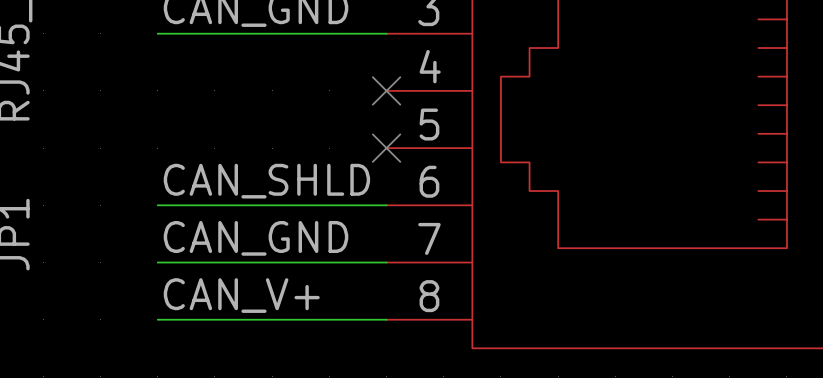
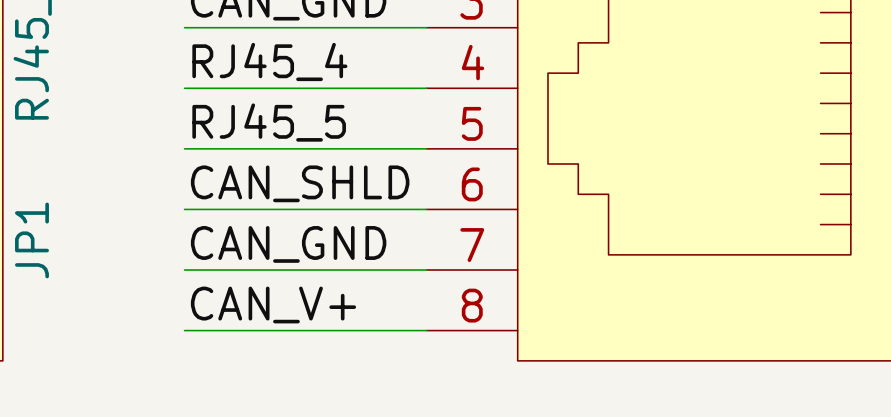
label: none -> RJ45_4 (269, 61)
wire: none -> (184, 88) (426, 88)
no-connect mark: (386, 90) -> none
label: none -> RJ45_5 (269, 122)
wire: none -> (184, 148) (426, 148)
no-connect mark: (386, 148) -> none

